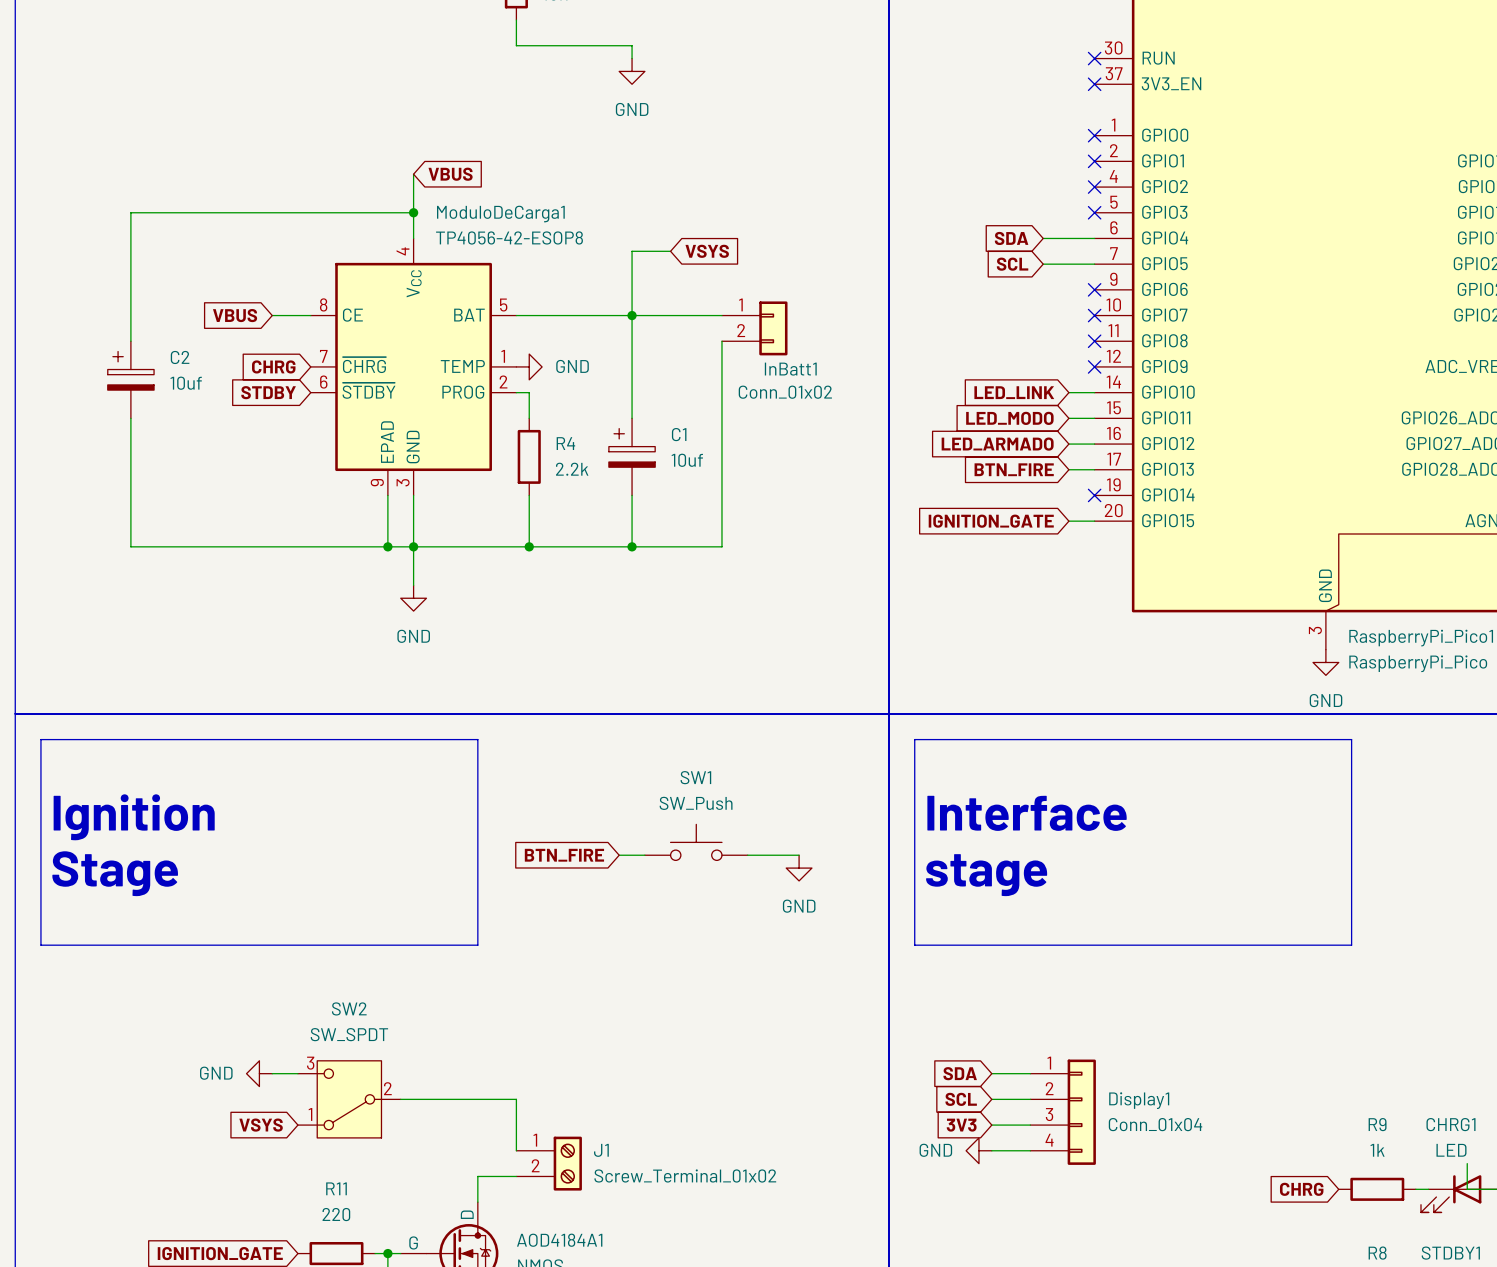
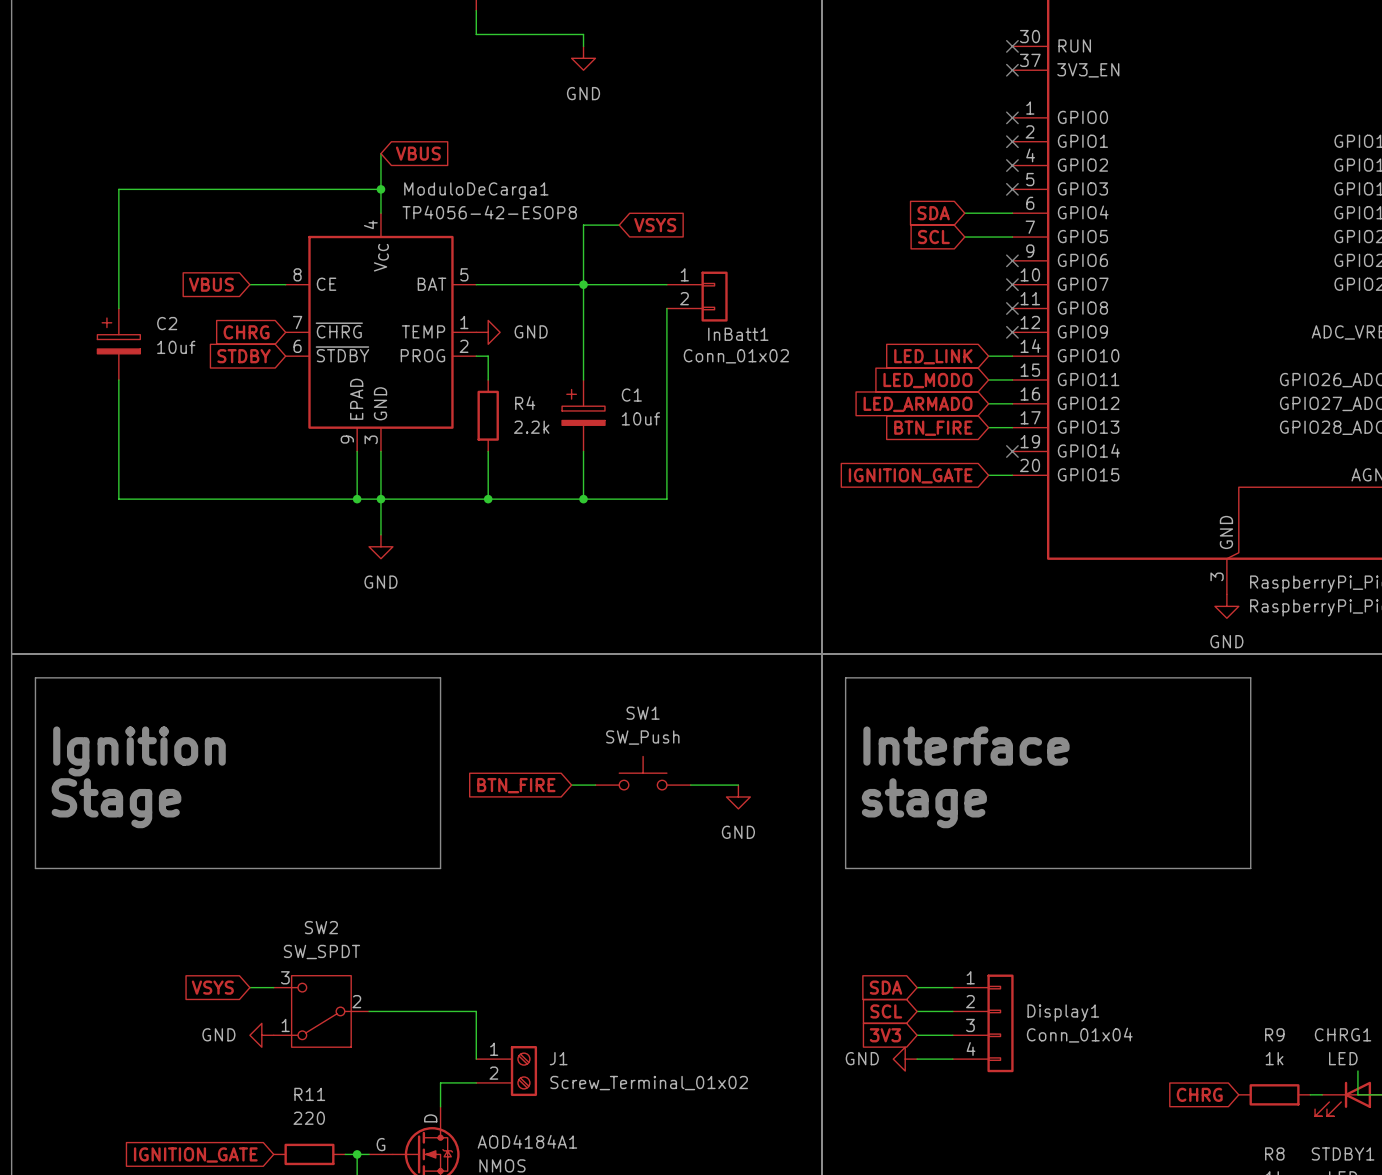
power symbol position: GND (259, 1073) -> GND (261, 1035)
global label position: VSYS (261, 1125) -> VSYS (212, 987)

